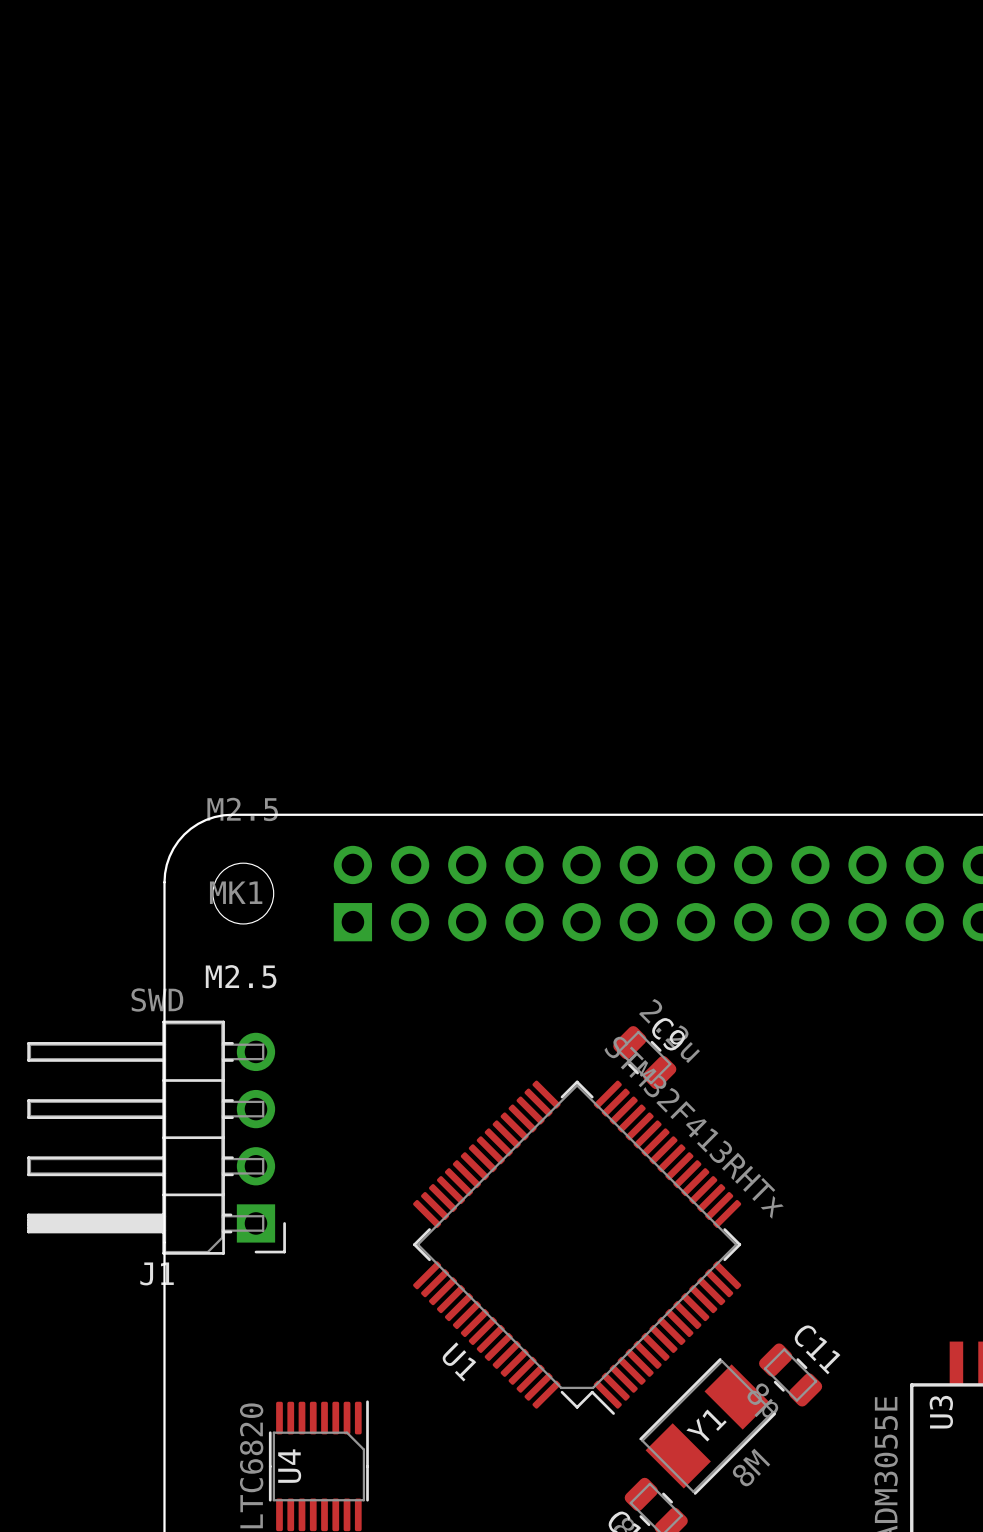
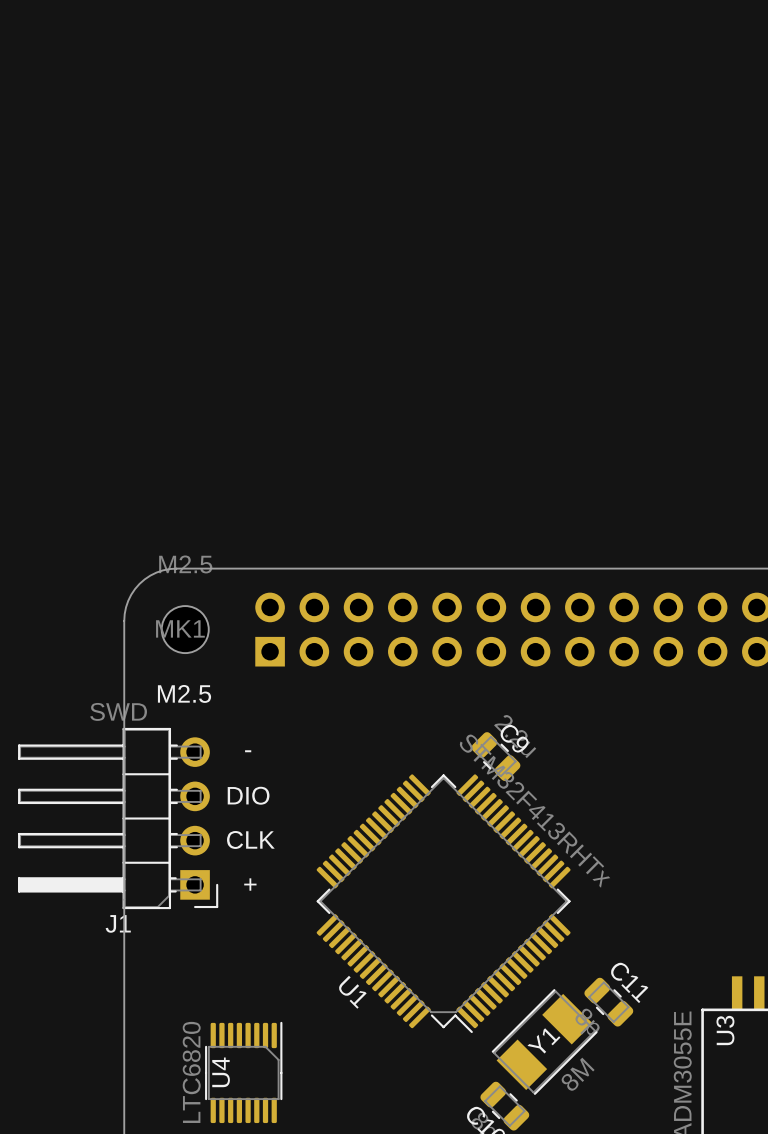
text: none -> - (248, 751)
text: none -> DIO (248, 795)
text: none -> CLK (250, 839)
text: none -> + (250, 884)

